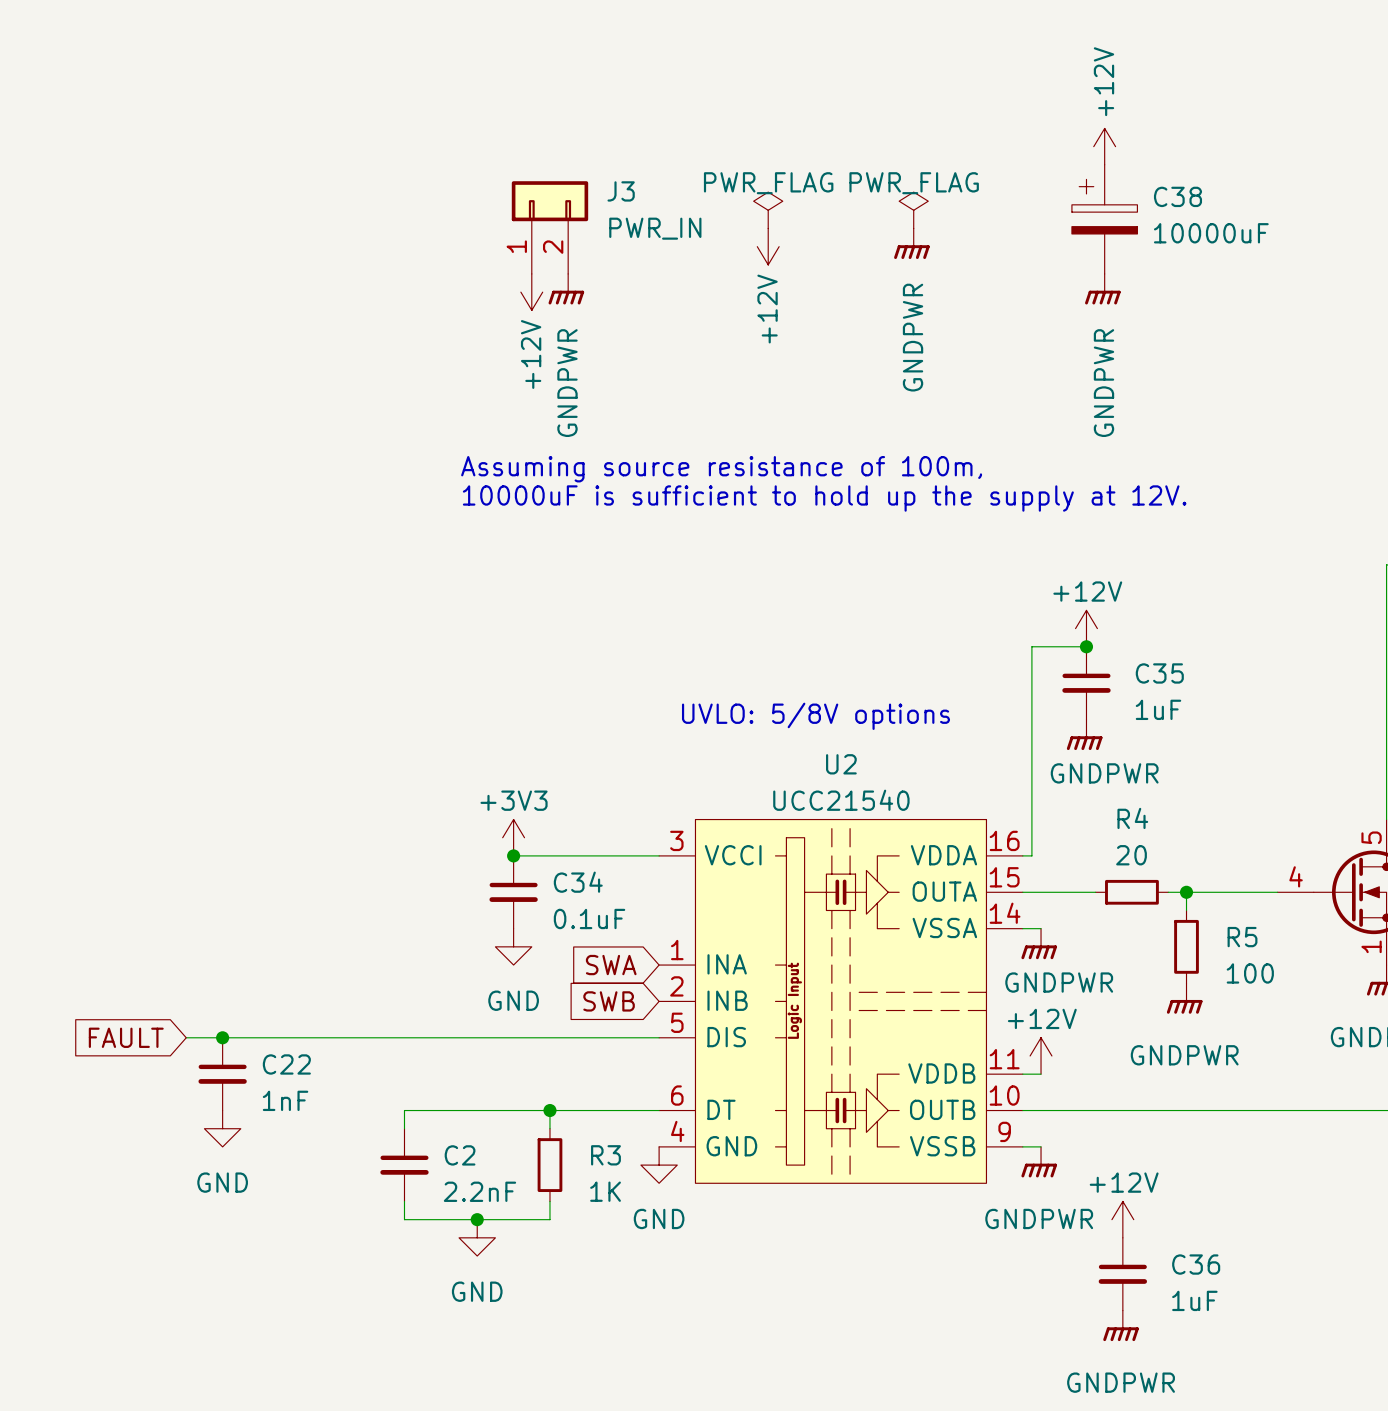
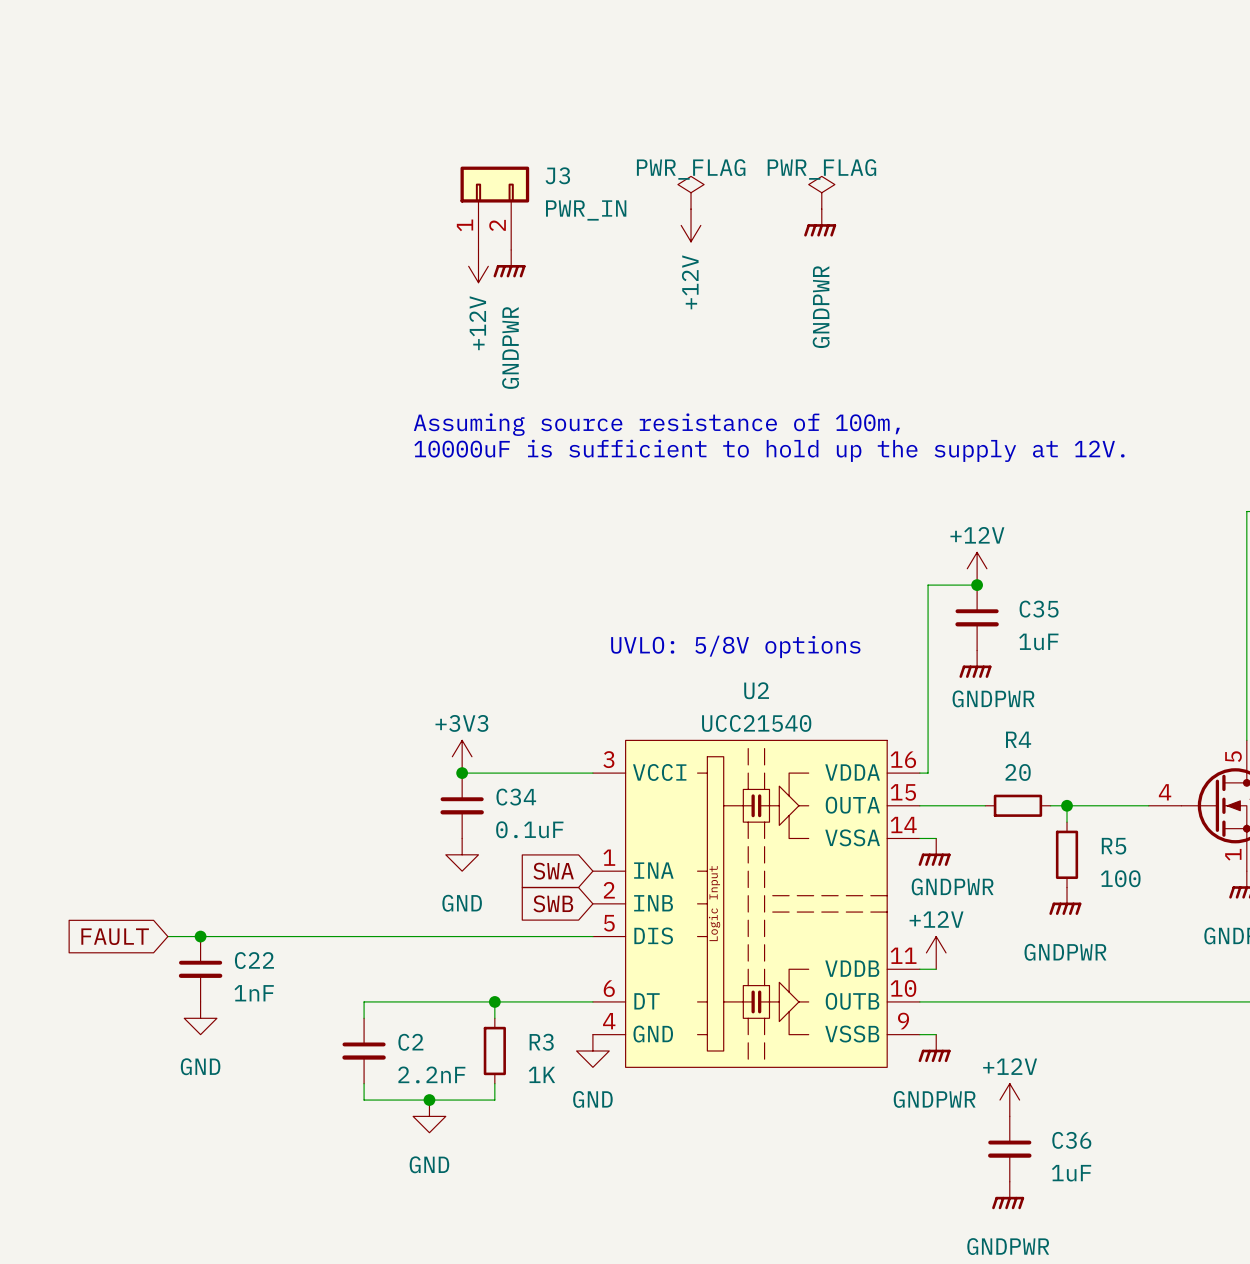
power symbol: +12V (1104, 146) -> none
C38: 10000uF (1104, 219) -> none
power symbol: GNDPWR (1102, 289) -> none

